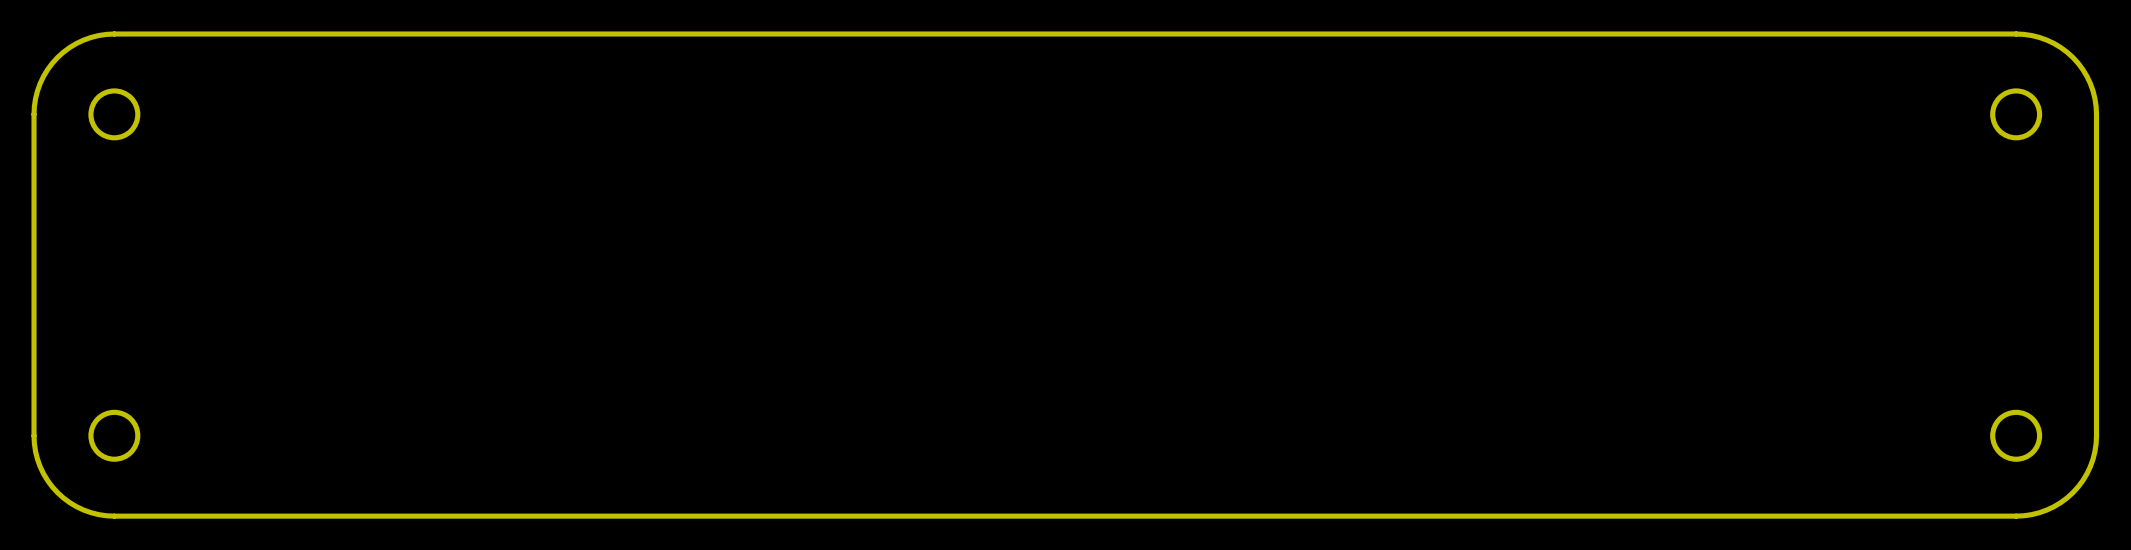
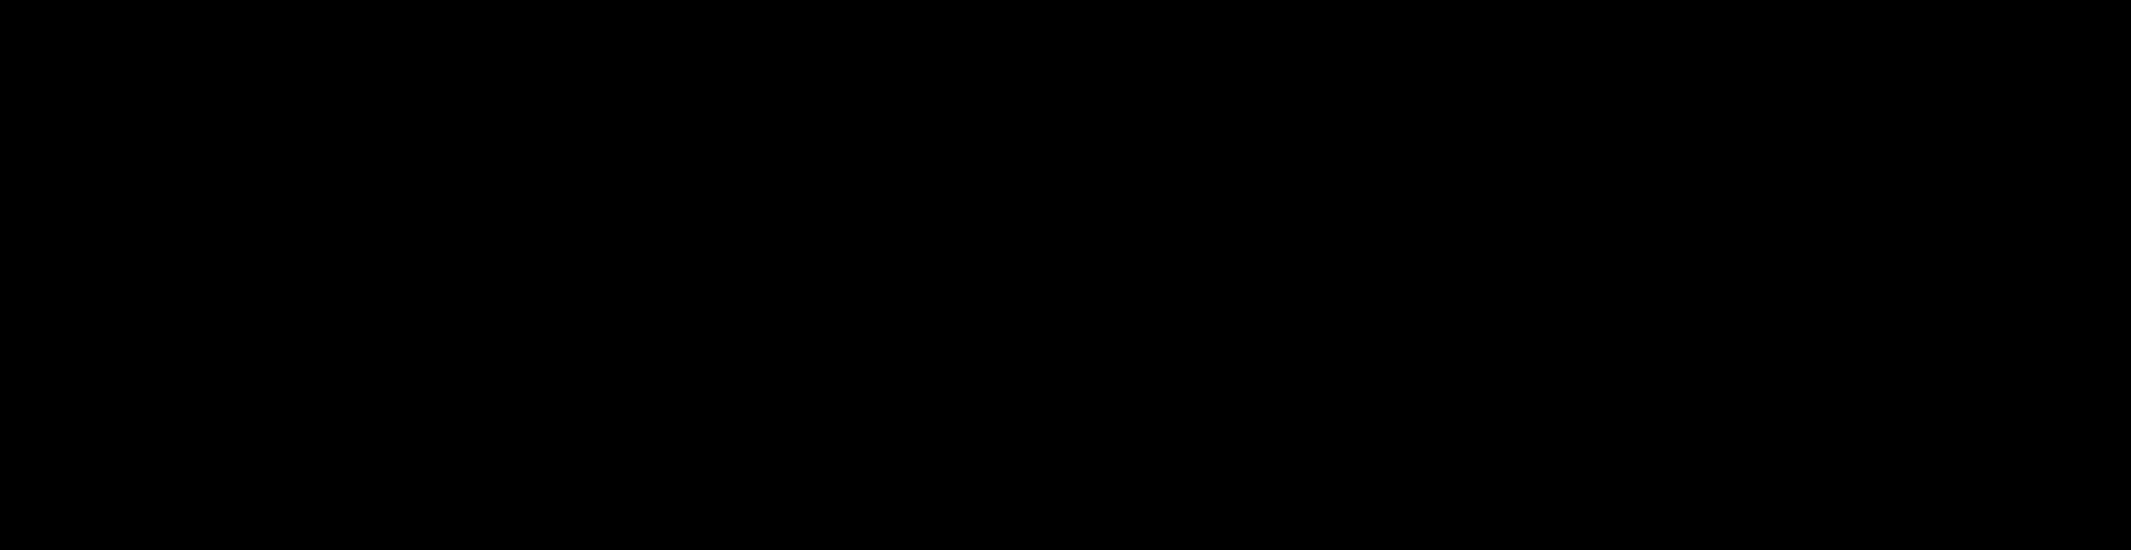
board edge: (114, 34) (2016, 34) (2031, 35) (2054, 43) (2072, 57) (2087, 76) (2094, 98) (2096, 114) (2094, 451) (2090, 466) (2082, 480) (2067, 497) (2046, 510) (2031, 514) (2016, 516) (114, 516) (98, 514) (76, 506) (57, 492) (43, 473) (35, 451) (34, 114) (35, 98) (40, 83) (47, 69) (57, 57) (69, 47) (83, 40) (98, 35) (114, 34) -> none
round board edge: [88, 88, 141, 141] -> none
round board edge: [1990, 88, 2043, 141] -> none
round board edge: [88, 409, 141, 462] -> none
round board edge: [1990, 409, 2043, 462] -> none

